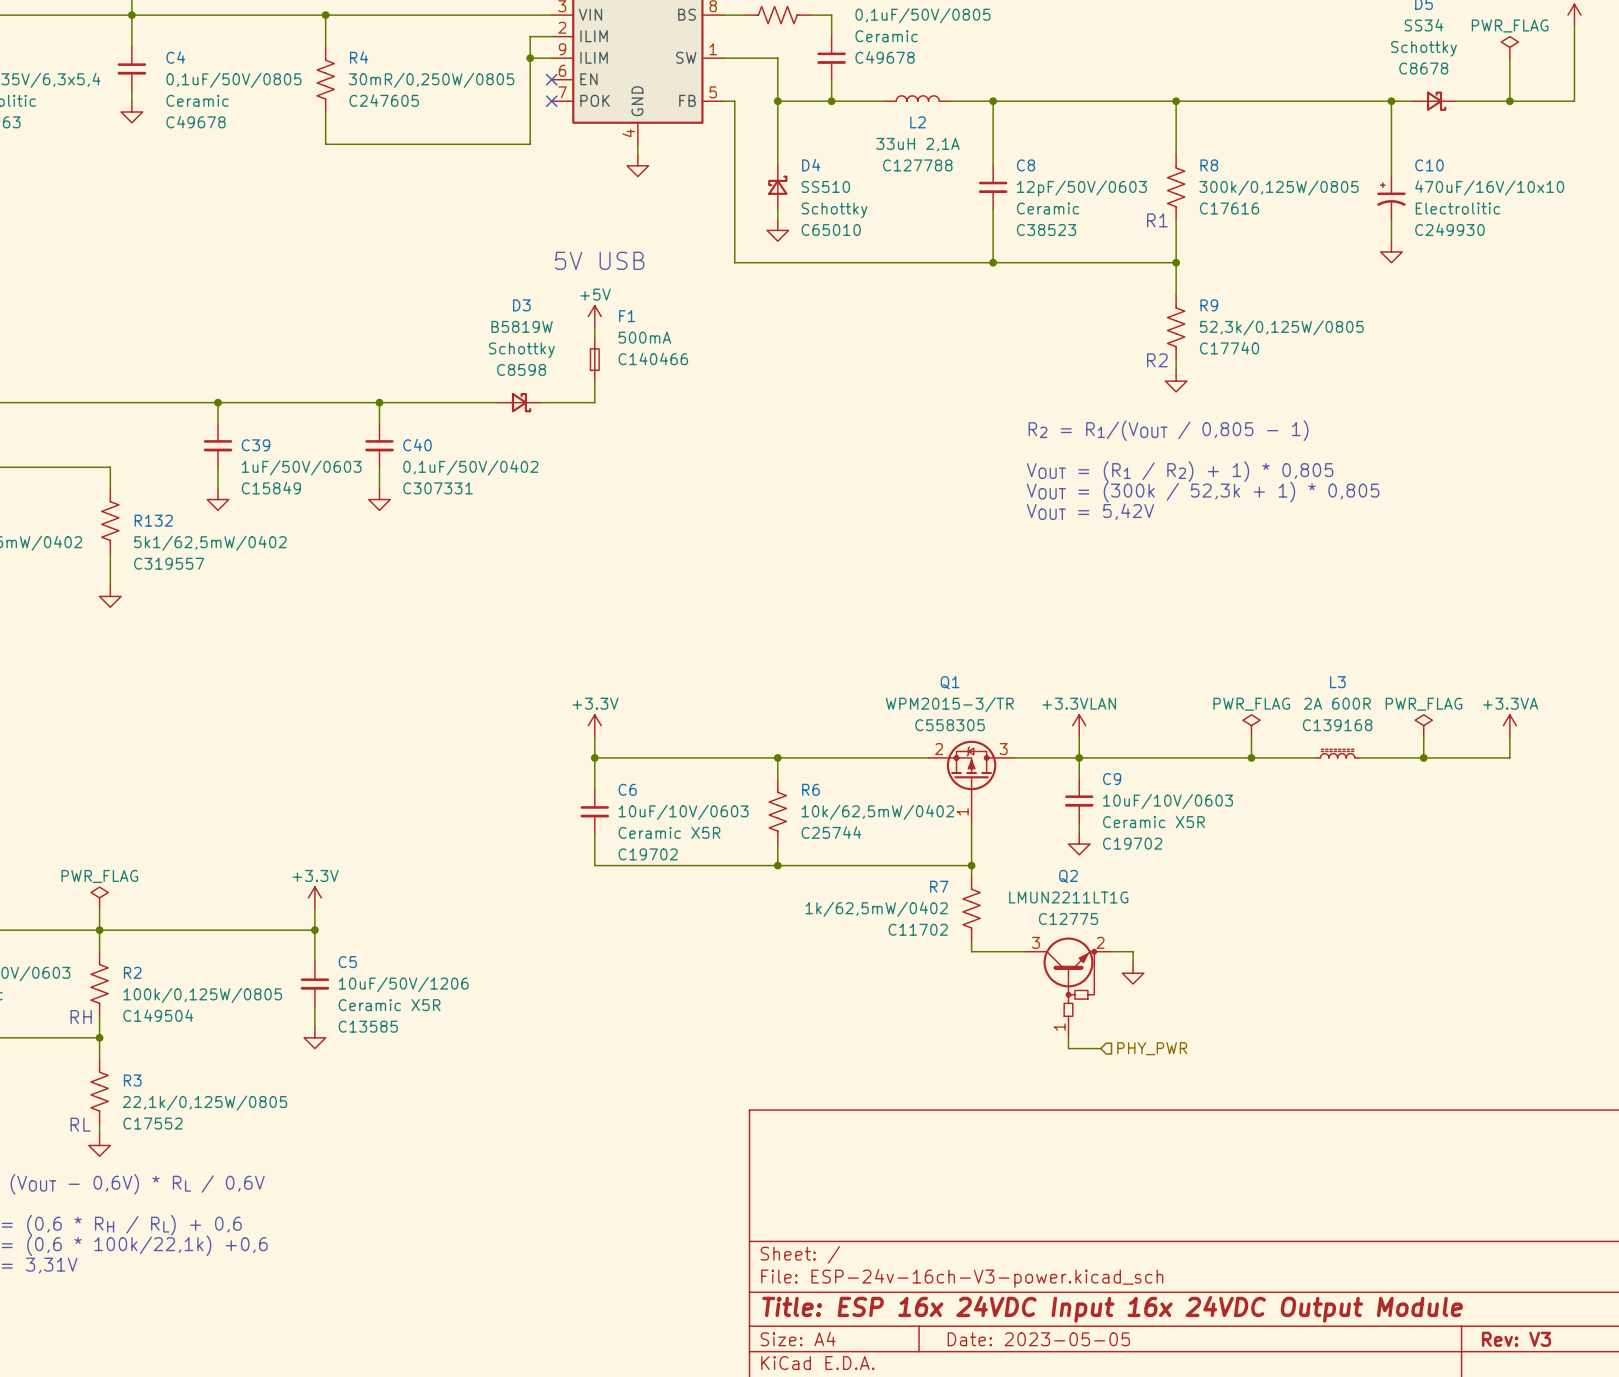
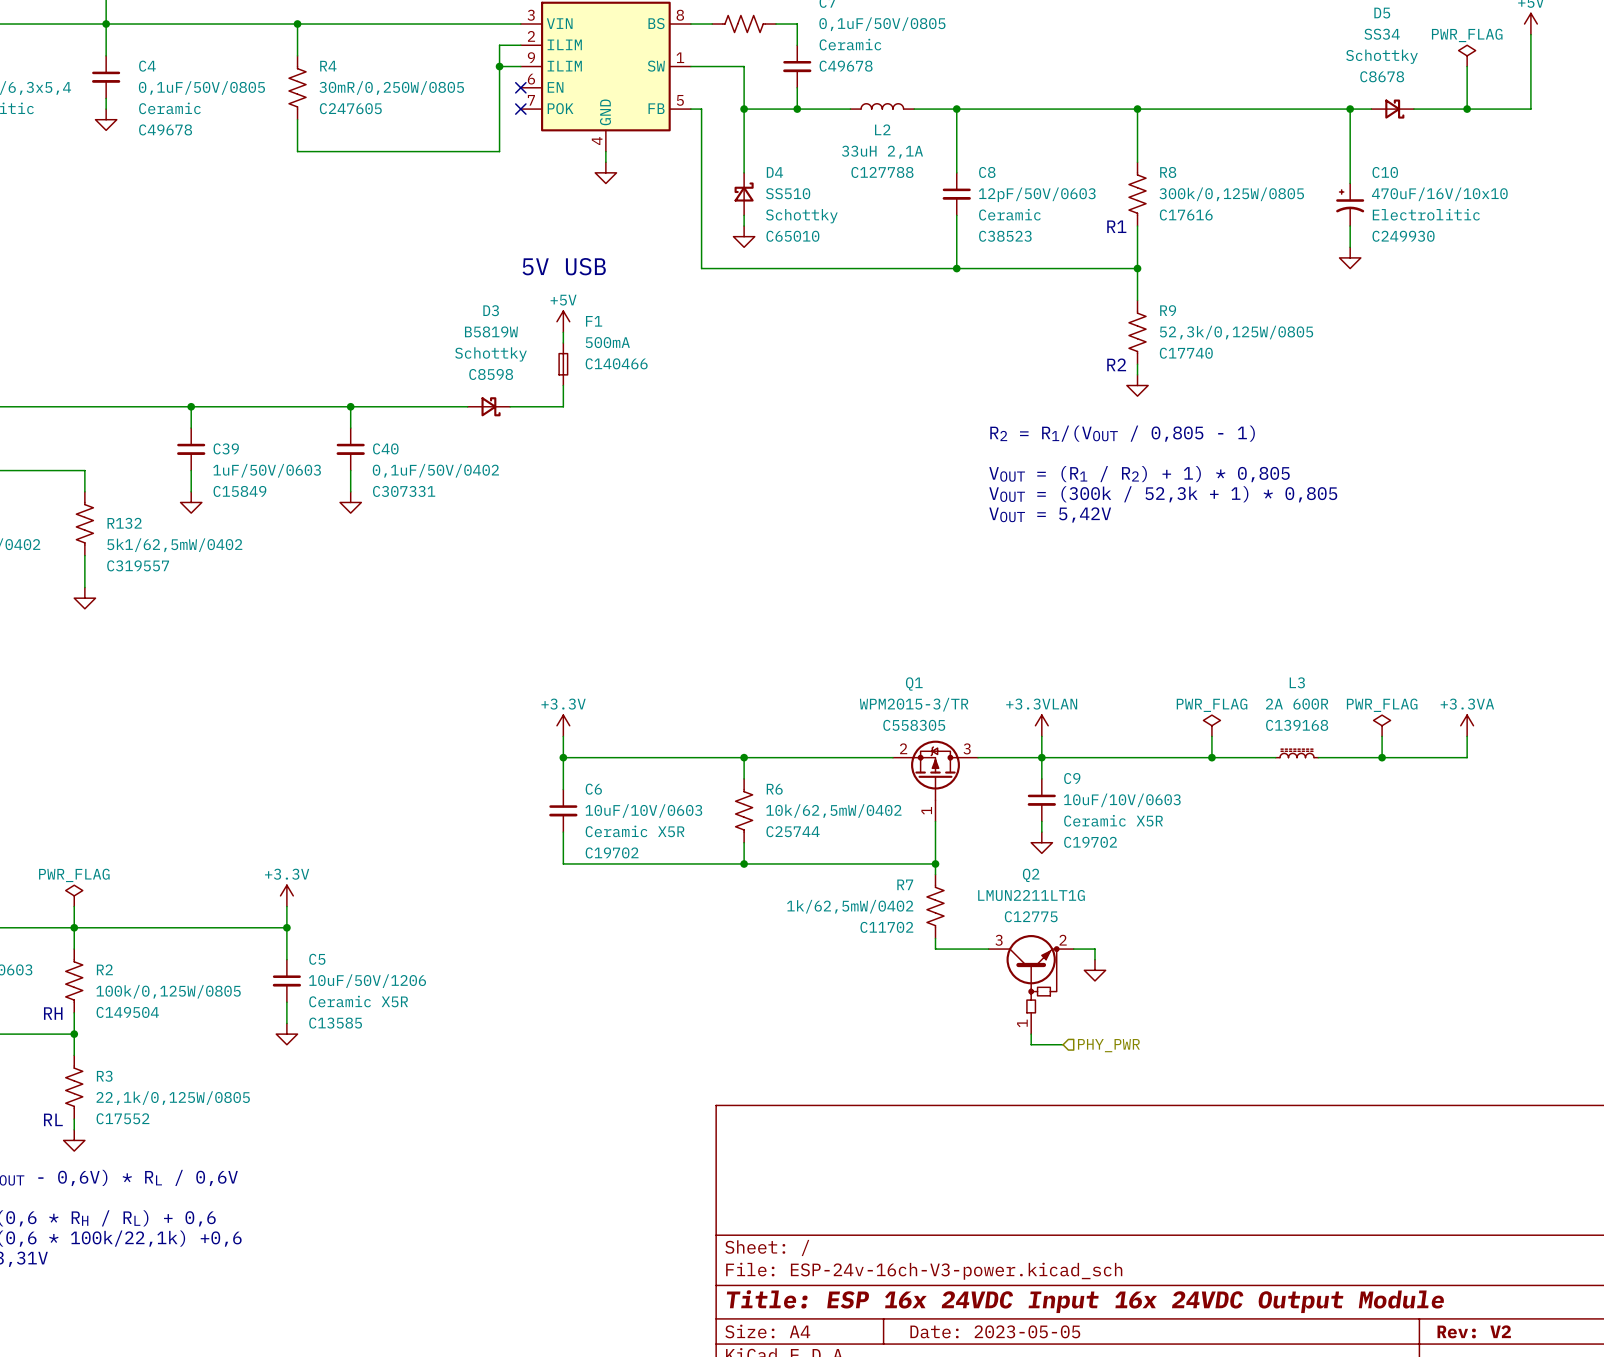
title block: Rev: V3 (1516, 1339) -> Rev: V2 (1474, 1331)

